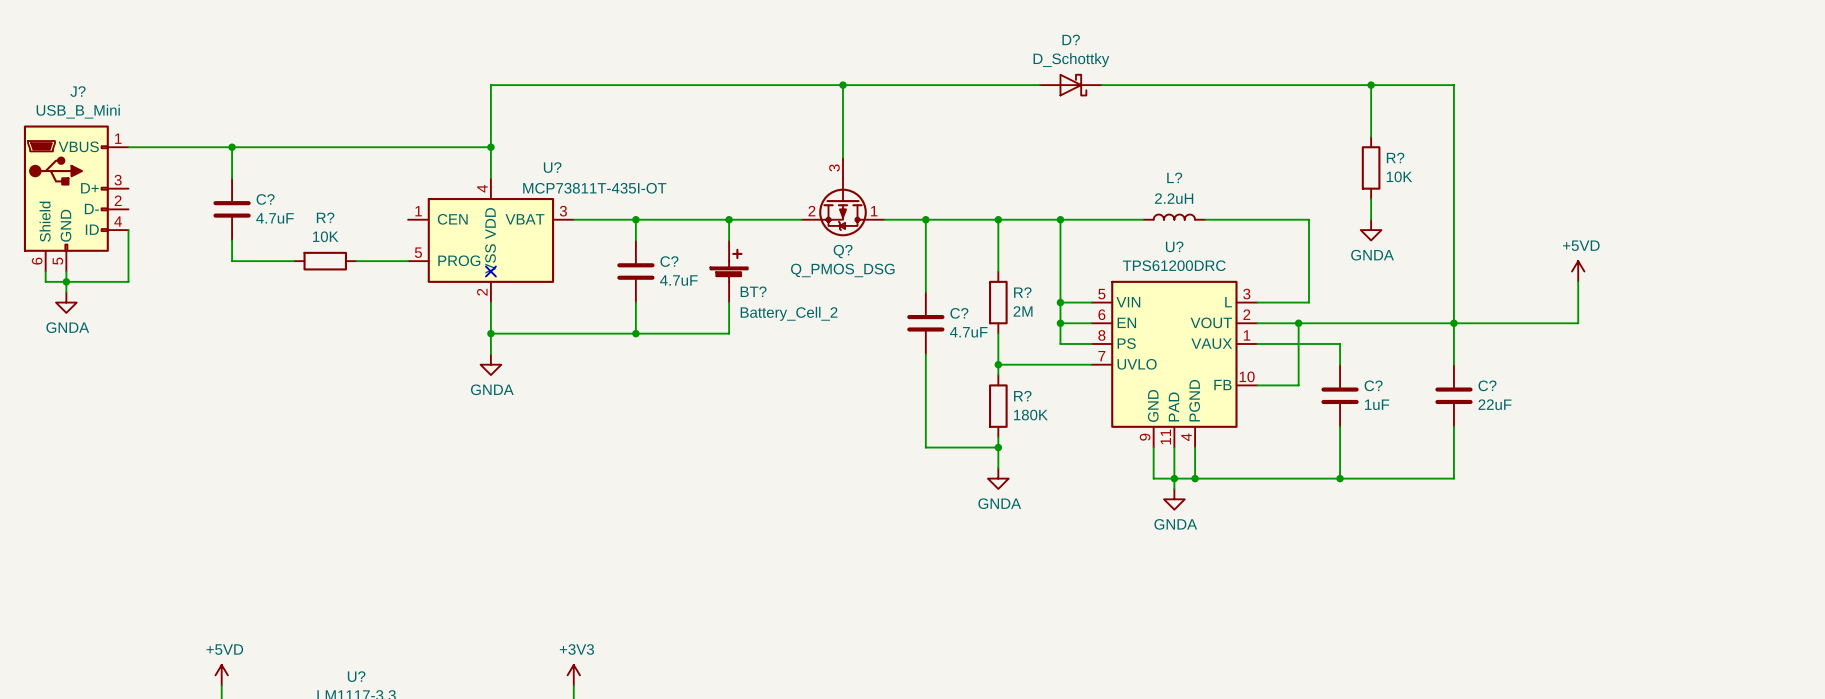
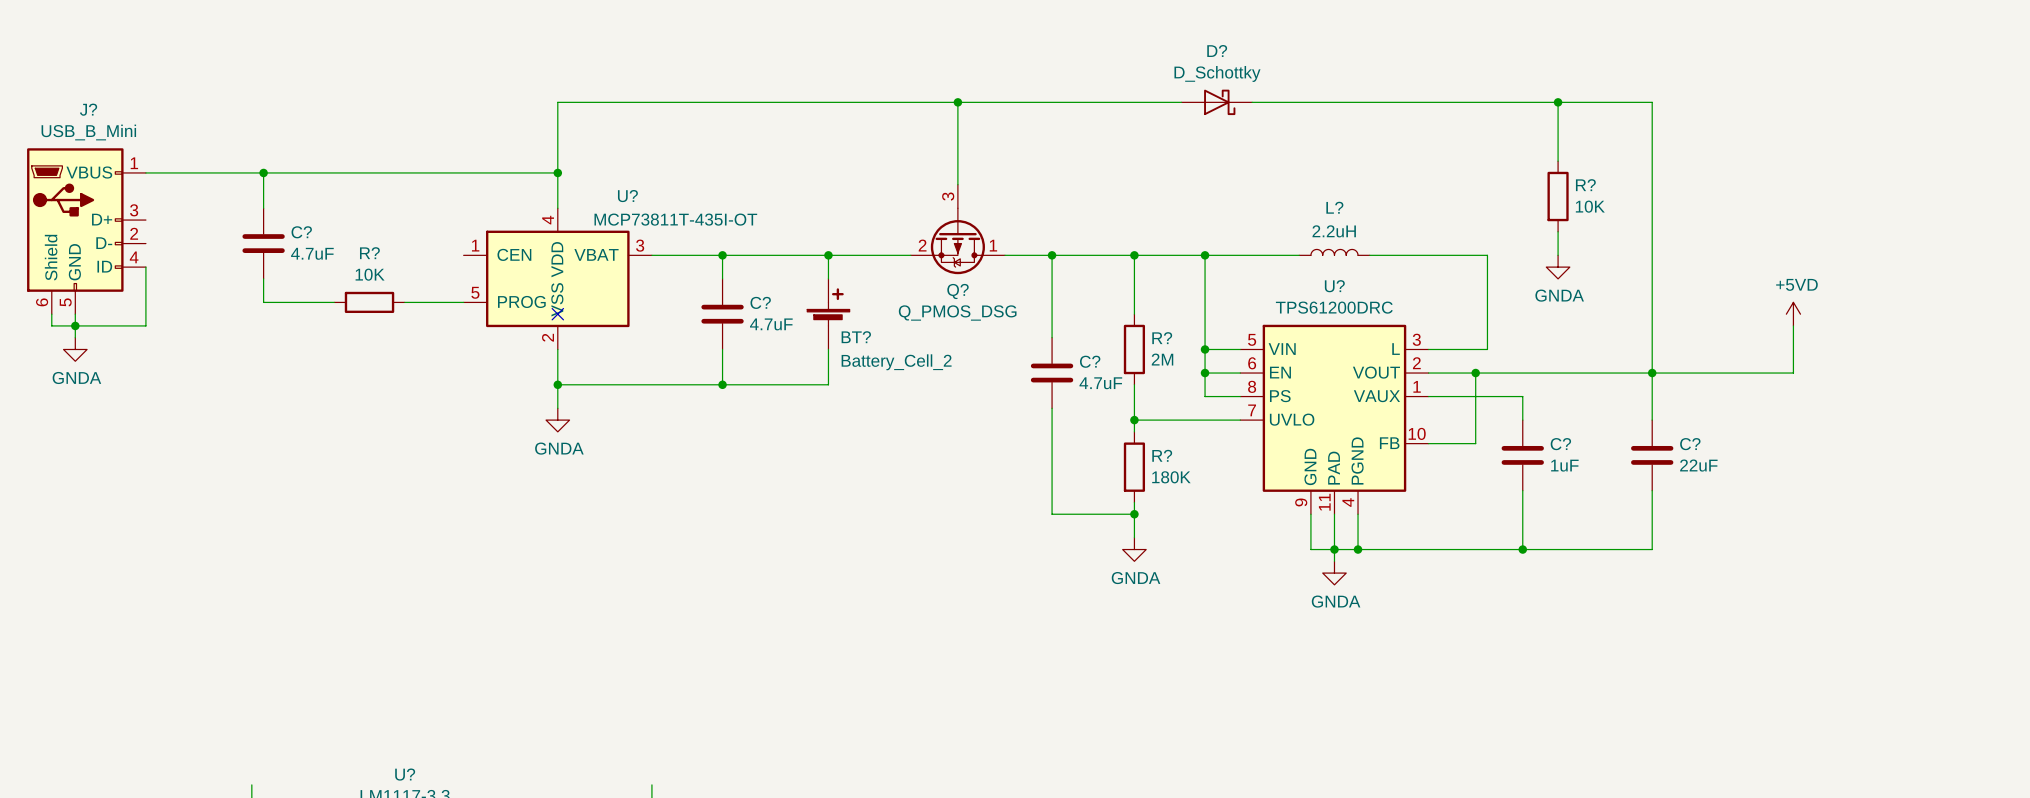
power symbol: +5VD (221, 675) -> none
power symbol: +3V3 (573, 675) -> none

